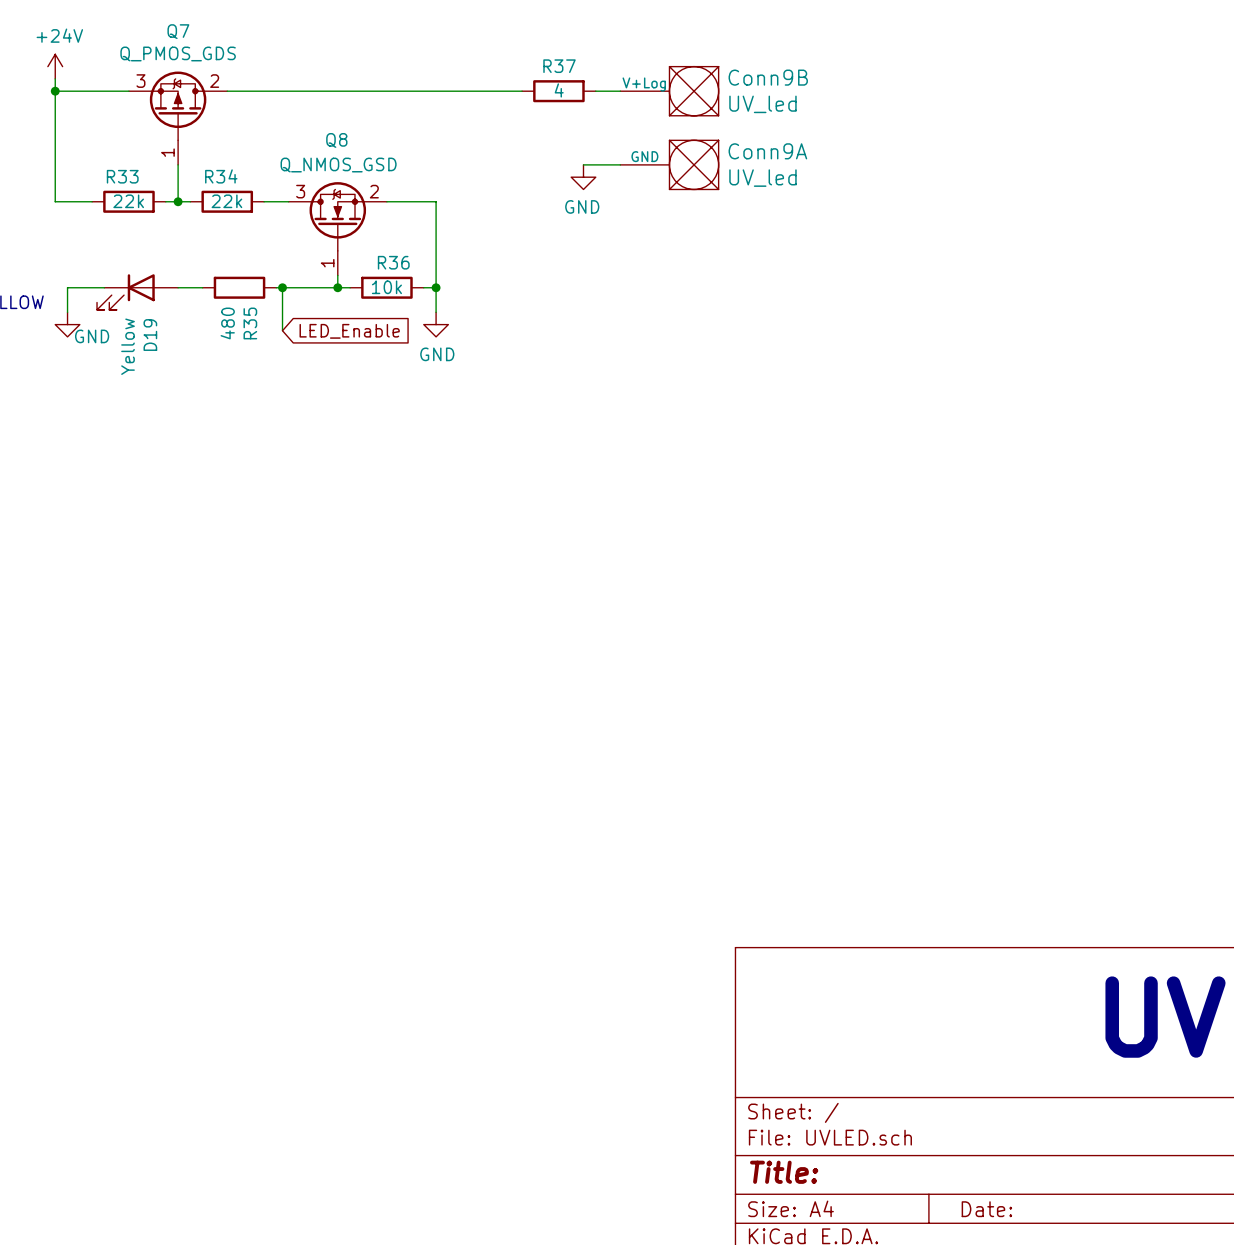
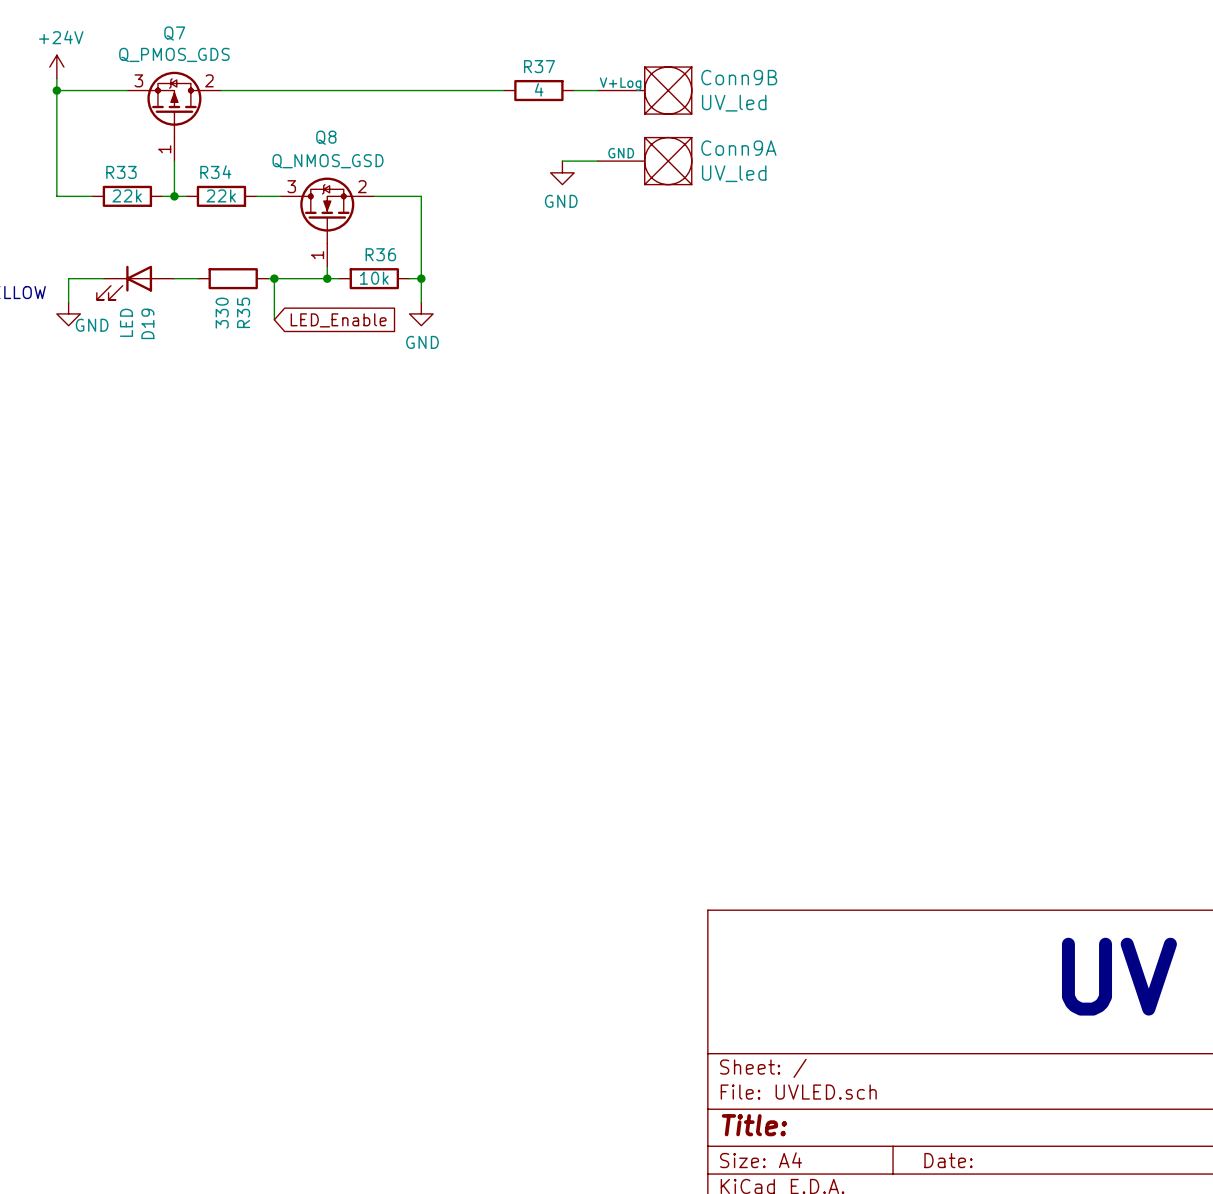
R35 value: 480 (227, 323) -> 330 (222, 313)
D19 value: Yellow (128, 346) -> LED (126, 322)

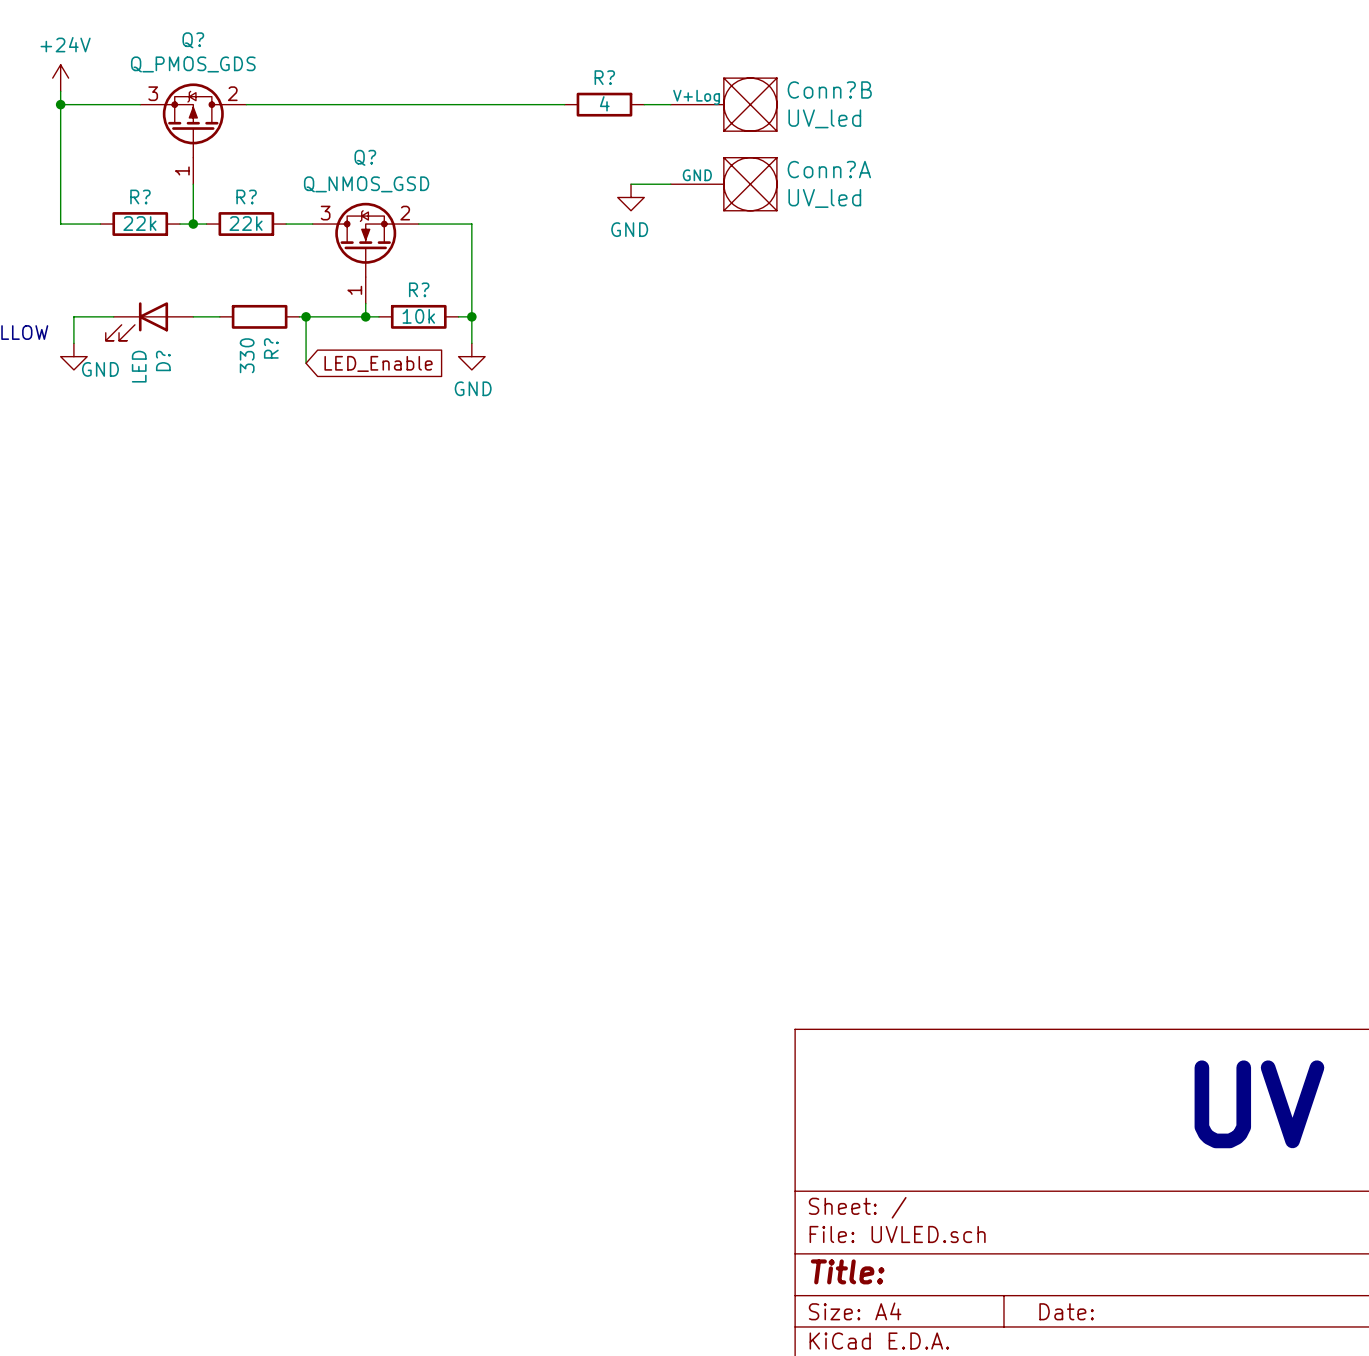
Q7 name: Q7 (174, 33) -> Q? (193, 40)
R37 name: R37 (539, 66) -> R? (604, 77)
Conn9B name: Conn9B (739, 77) -> Conn?B (829, 89)
Q8 name: Q8 (326, 137) -> Q? (365, 157)
Conn9A name: Conn9A (738, 148) -> Conn?A (829, 169)
R33 name: R33 (121, 172) -> R? (140, 196)
R34 name: R34 (215, 172) -> R? (246, 196)
R36 name: R36 (380, 254) -> R? (419, 289)
R35 name: R35 (243, 312) -> R? (271, 348)
D19 name: D19 (147, 323) -> D? (163, 360)

